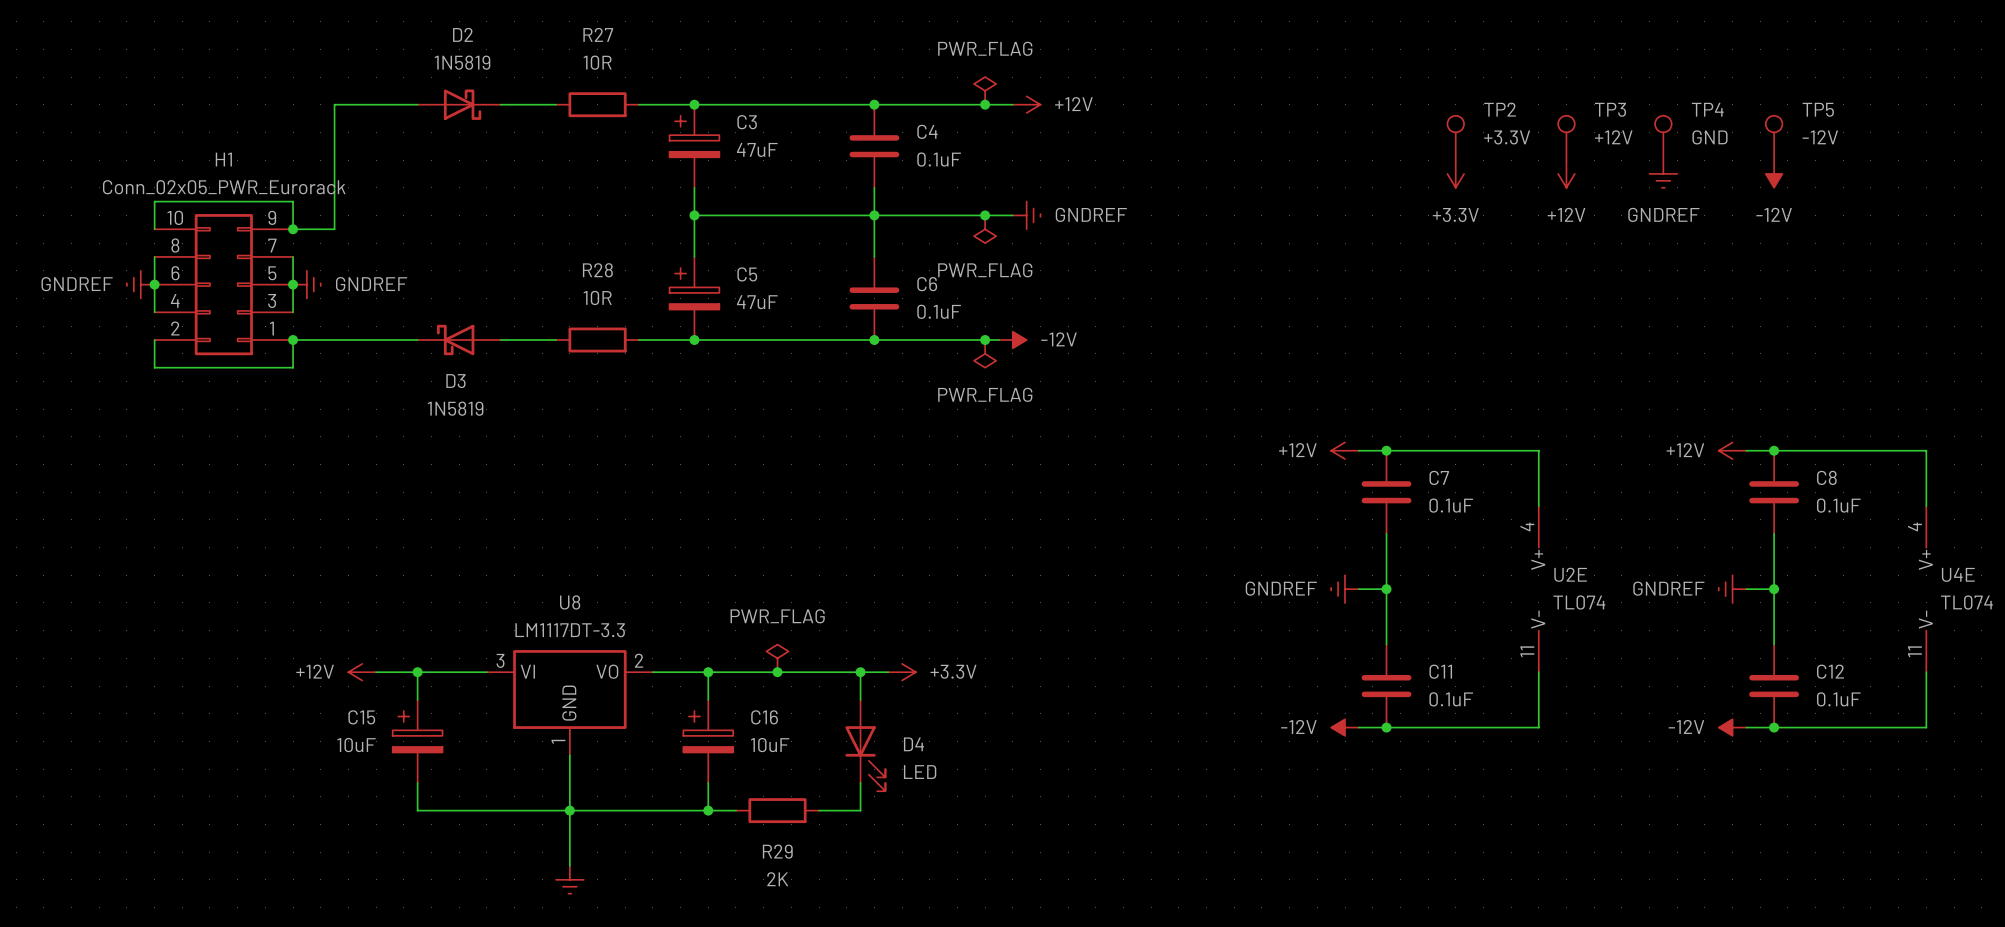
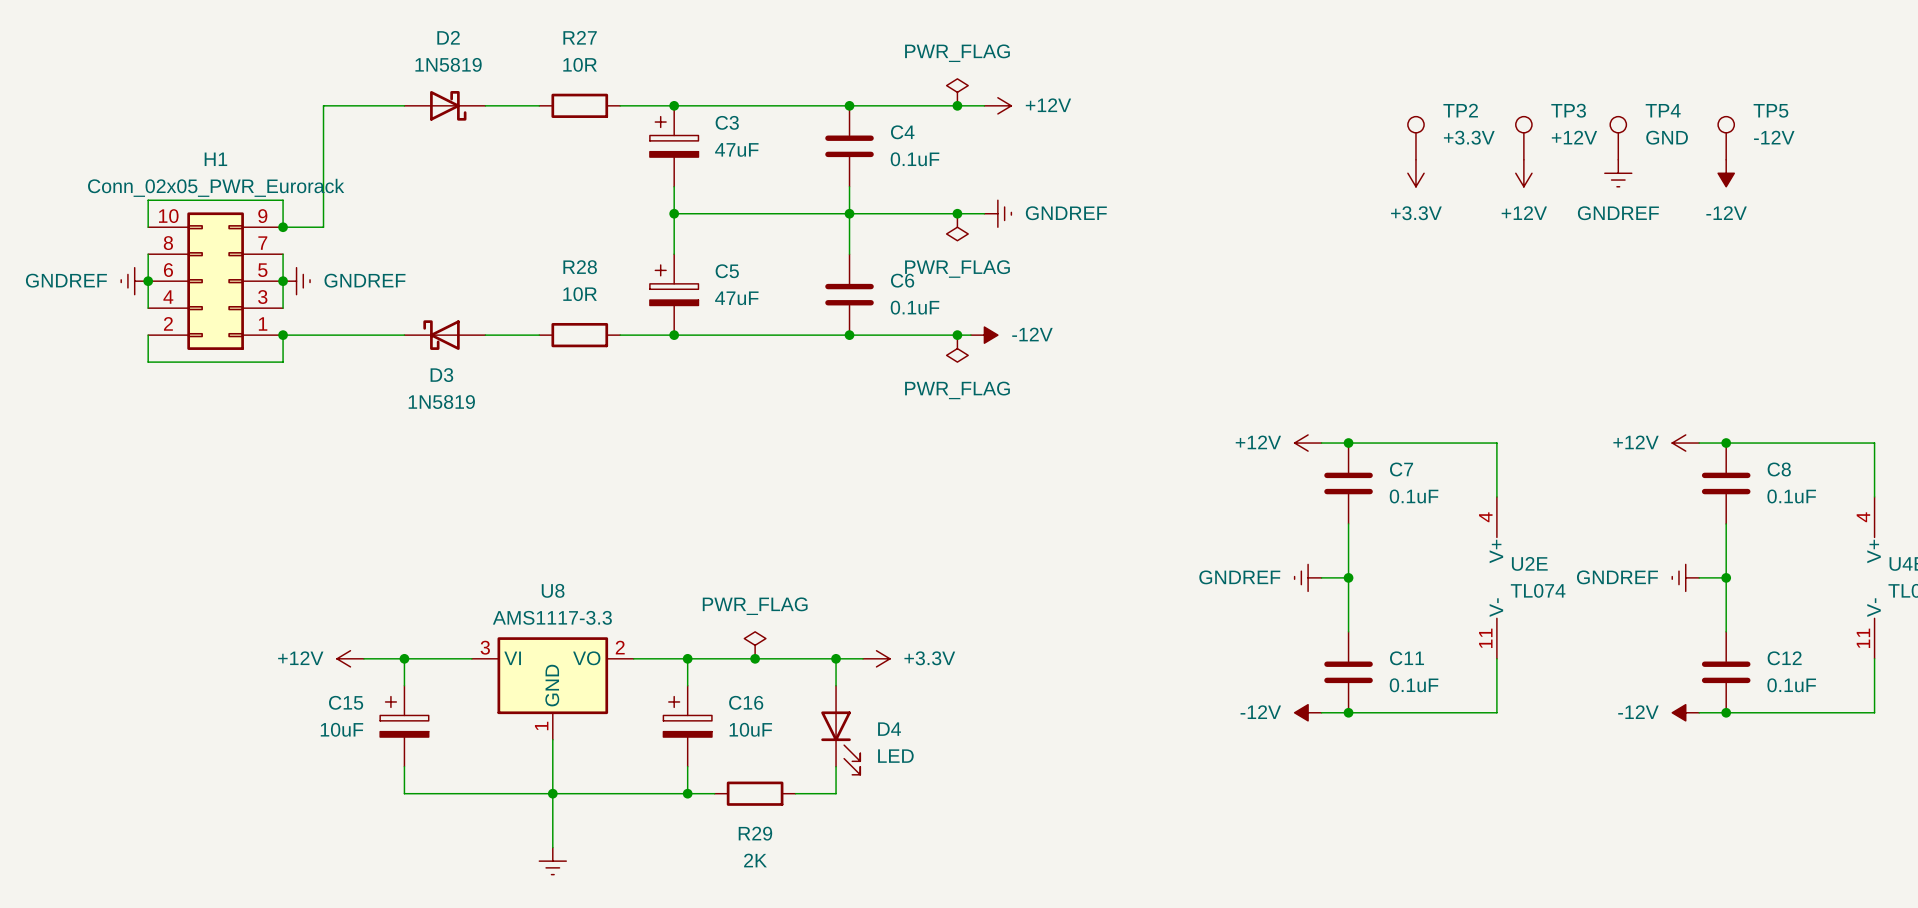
U8 value: LM1117DT-3.3 (570, 630) -> AMS1117-3.3 (552, 617)

